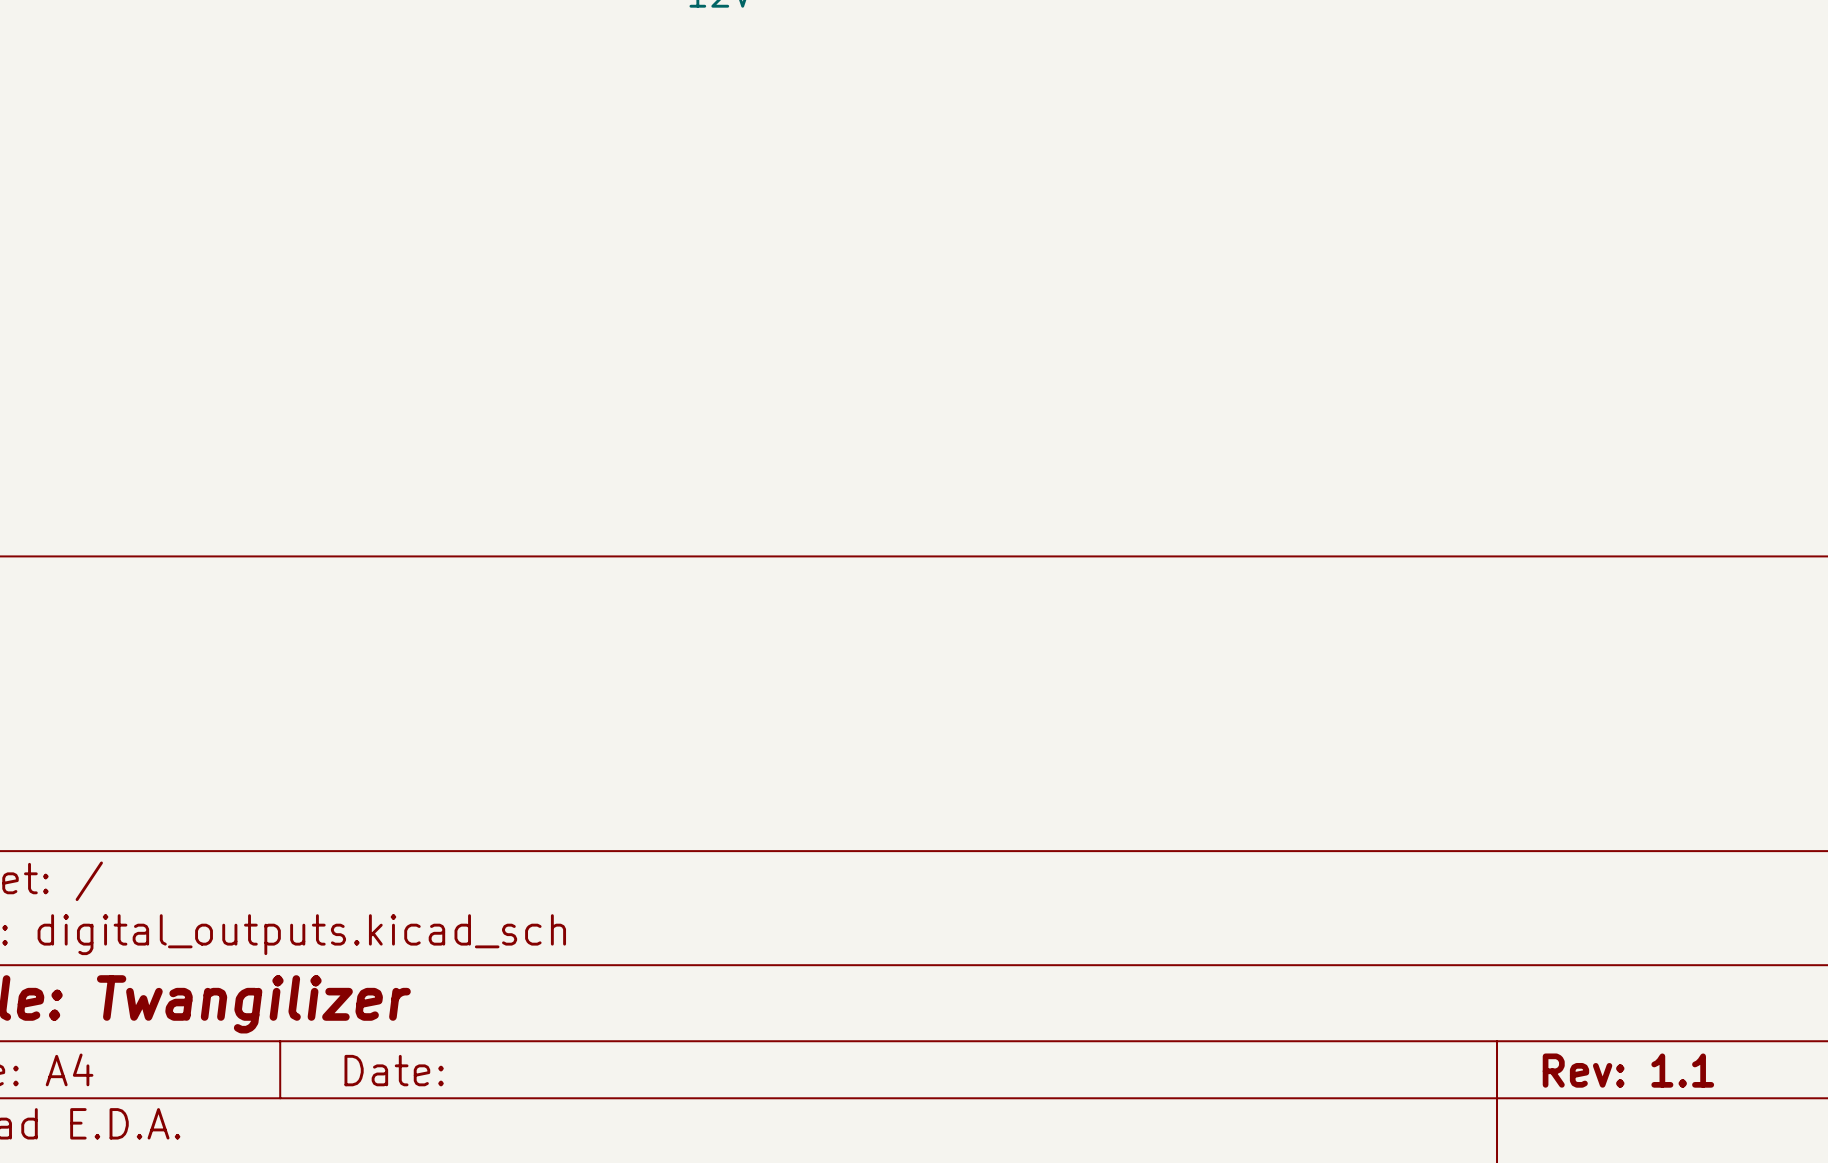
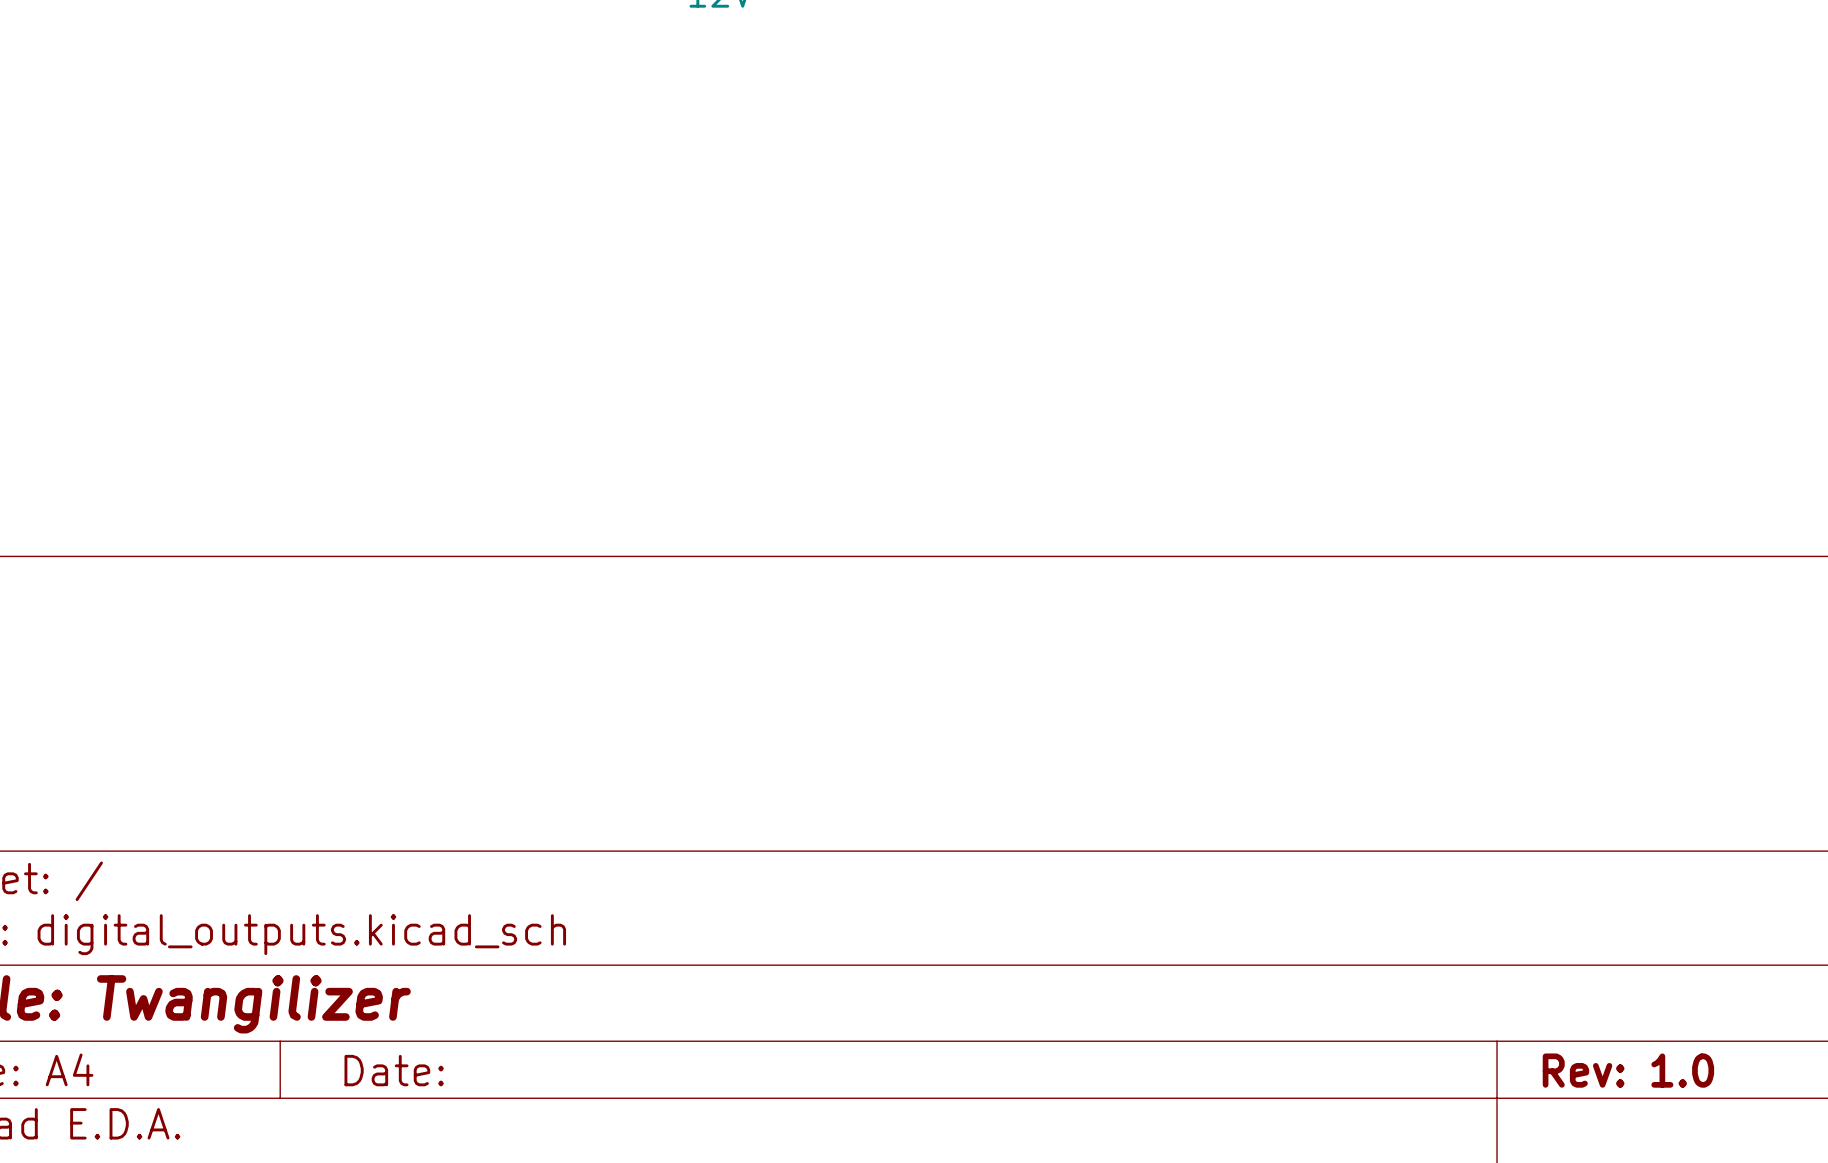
title block: Rev: 1.1 (1628, 1070) -> Rev: 1.0 (1628, 1070)

